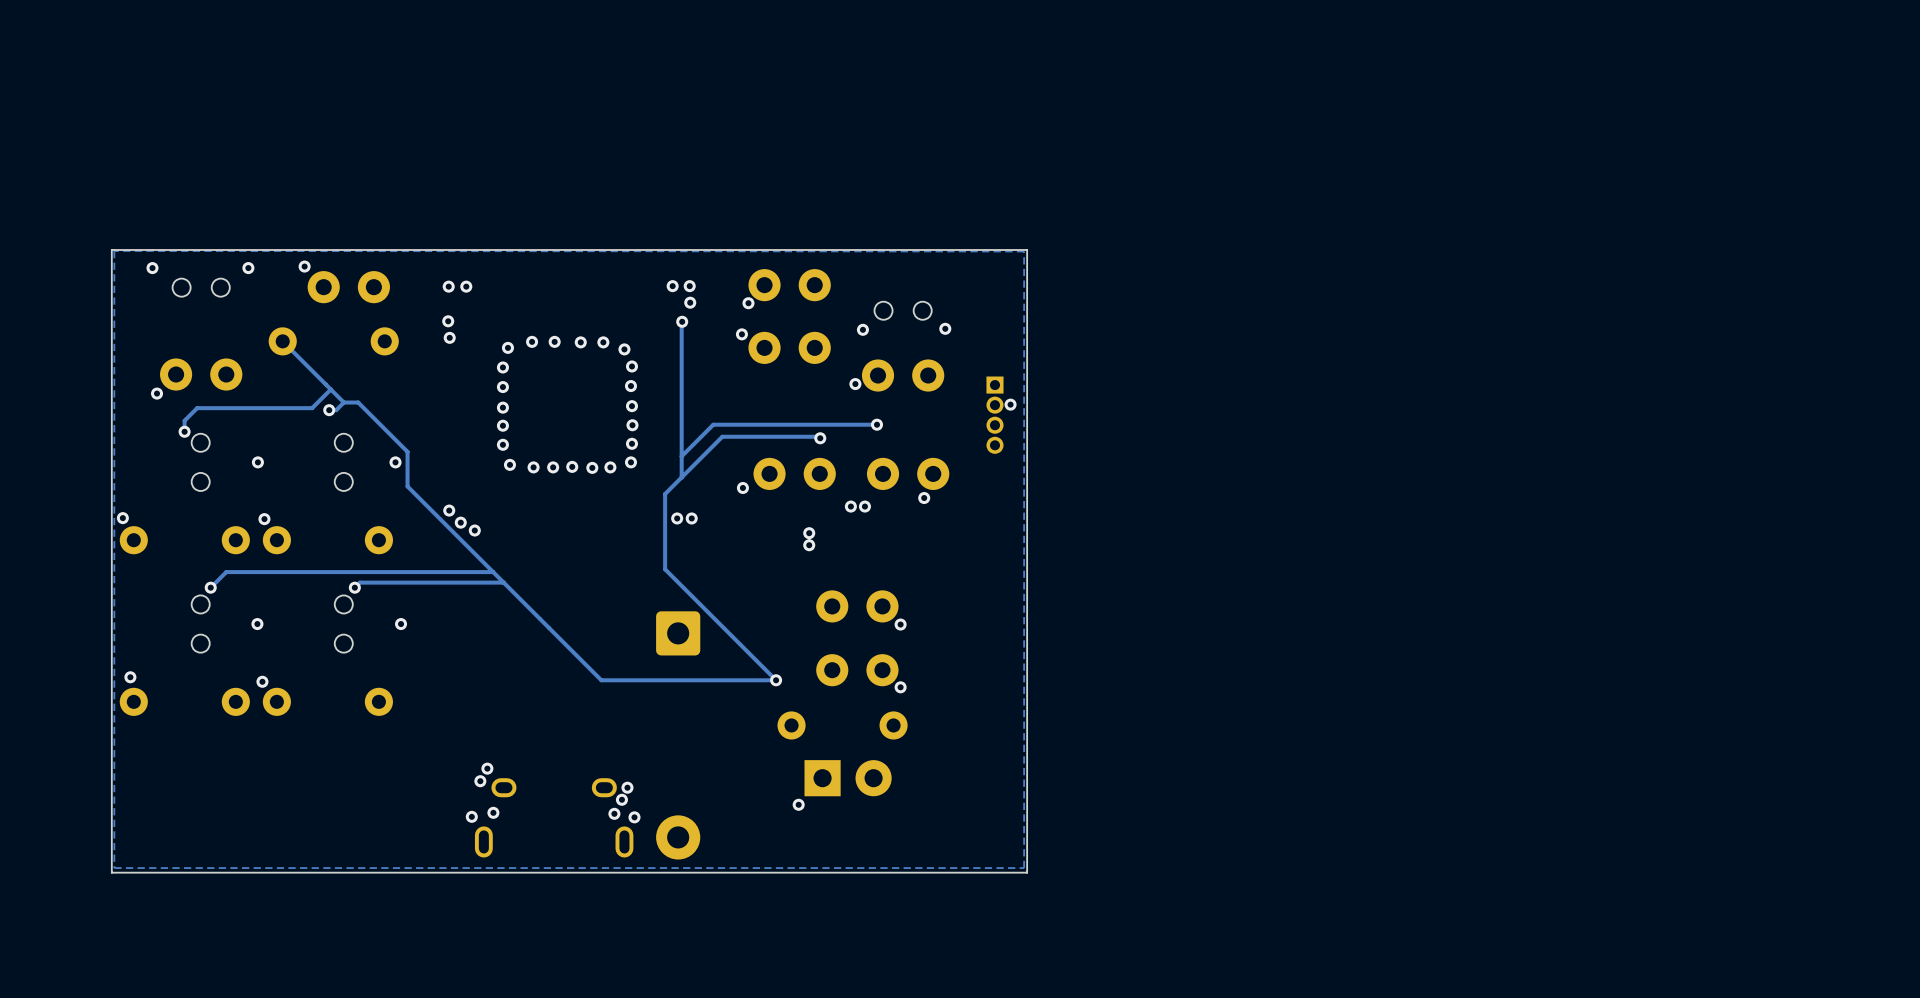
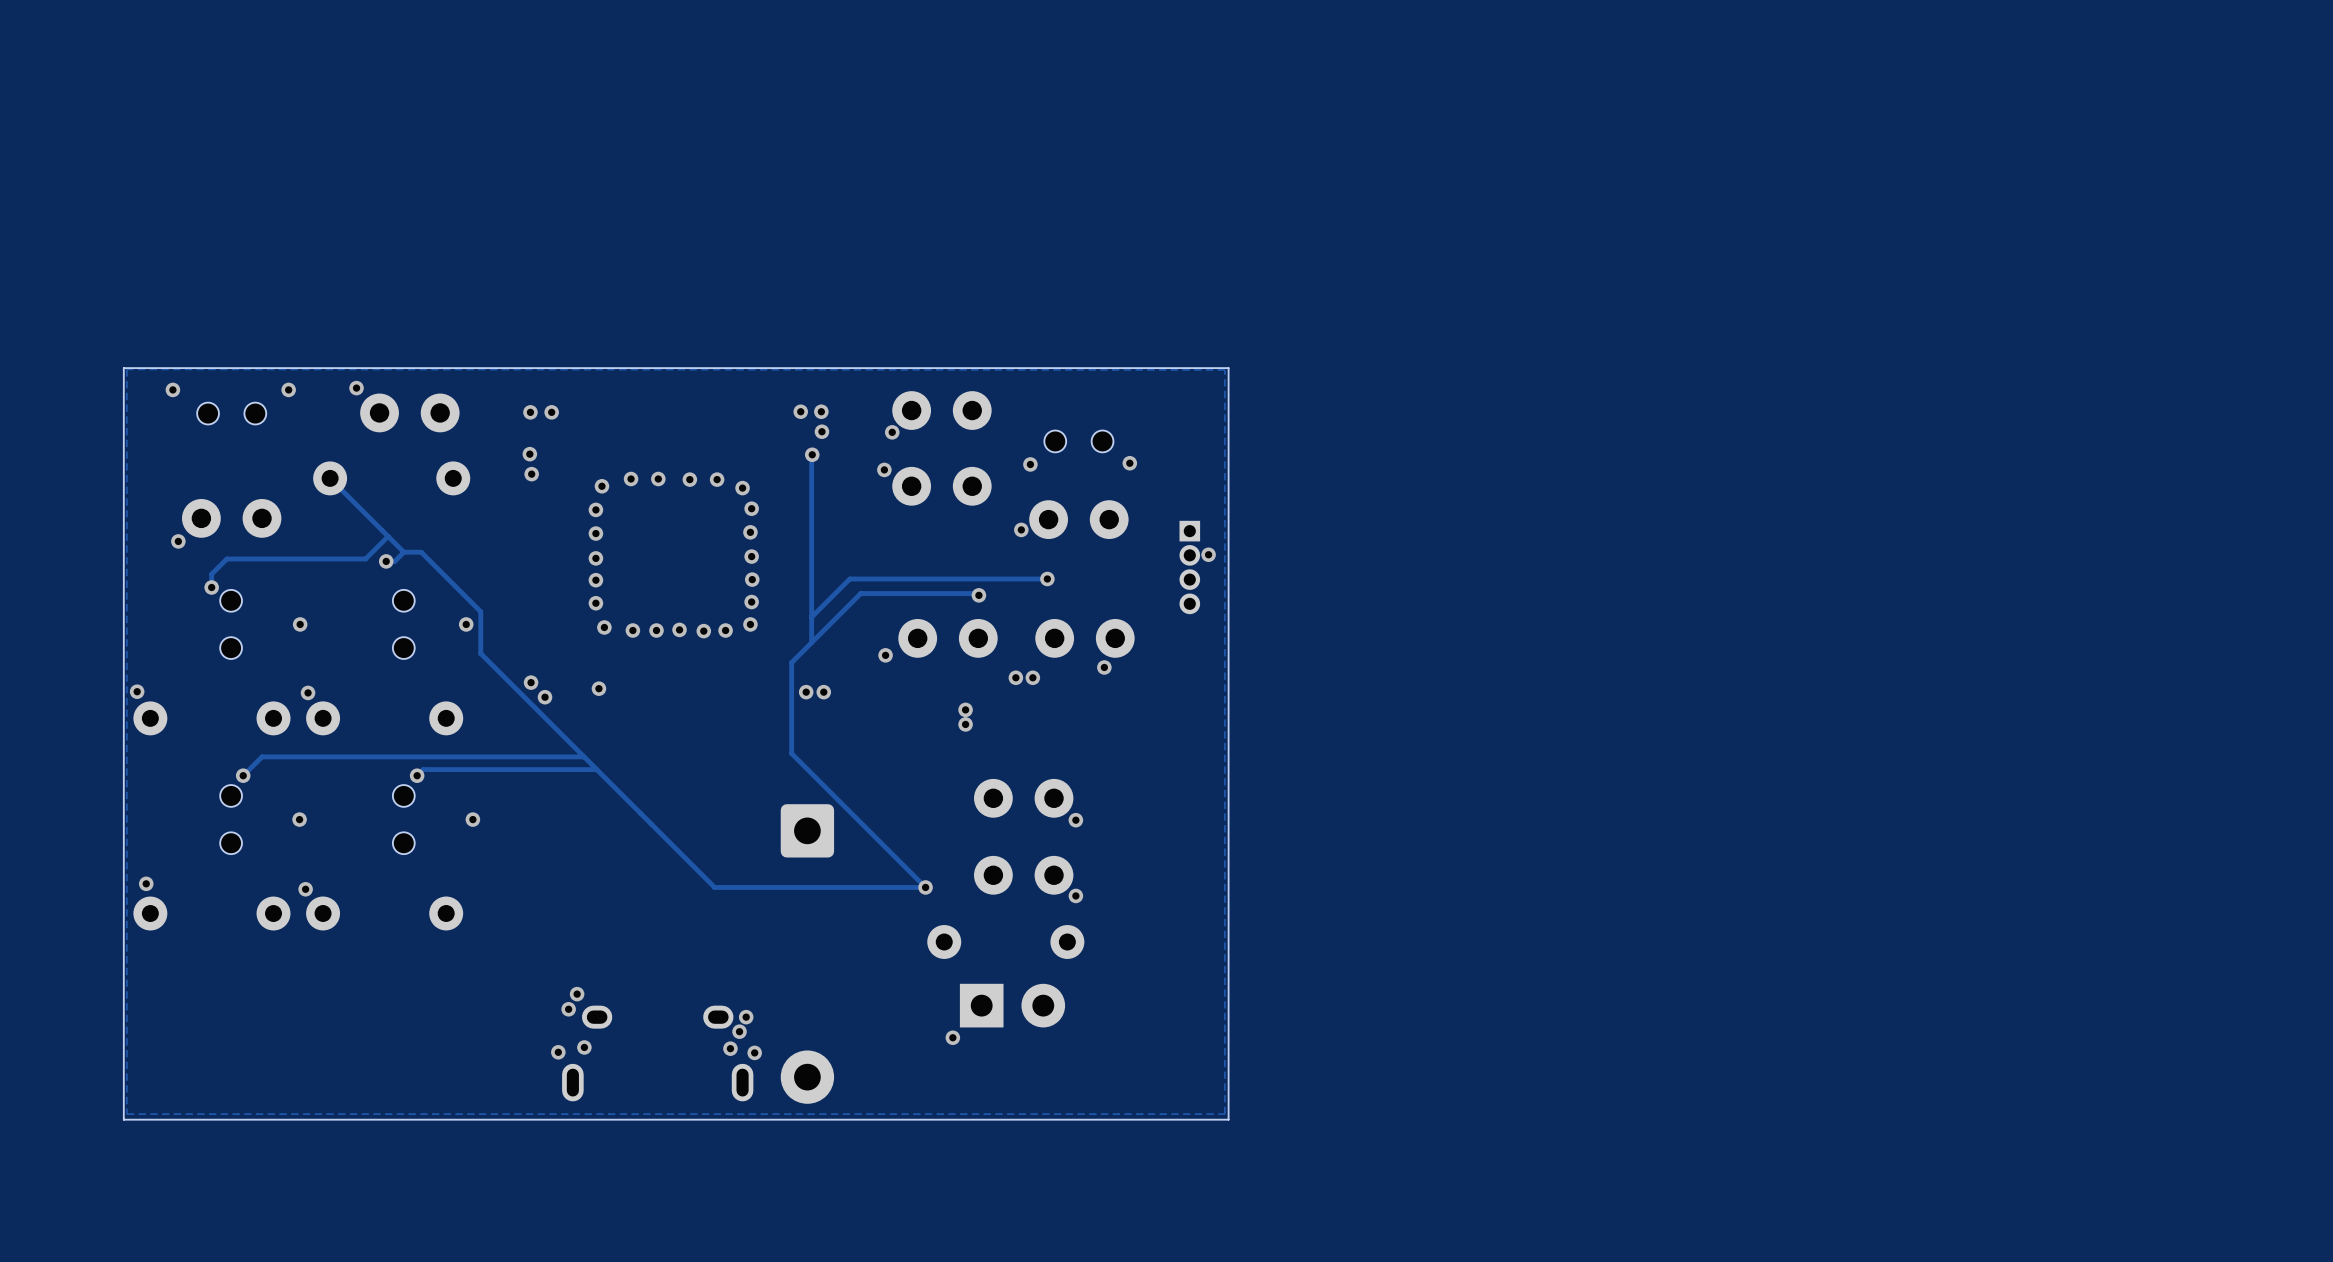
via position: (474, 530) -> (598, 688)

